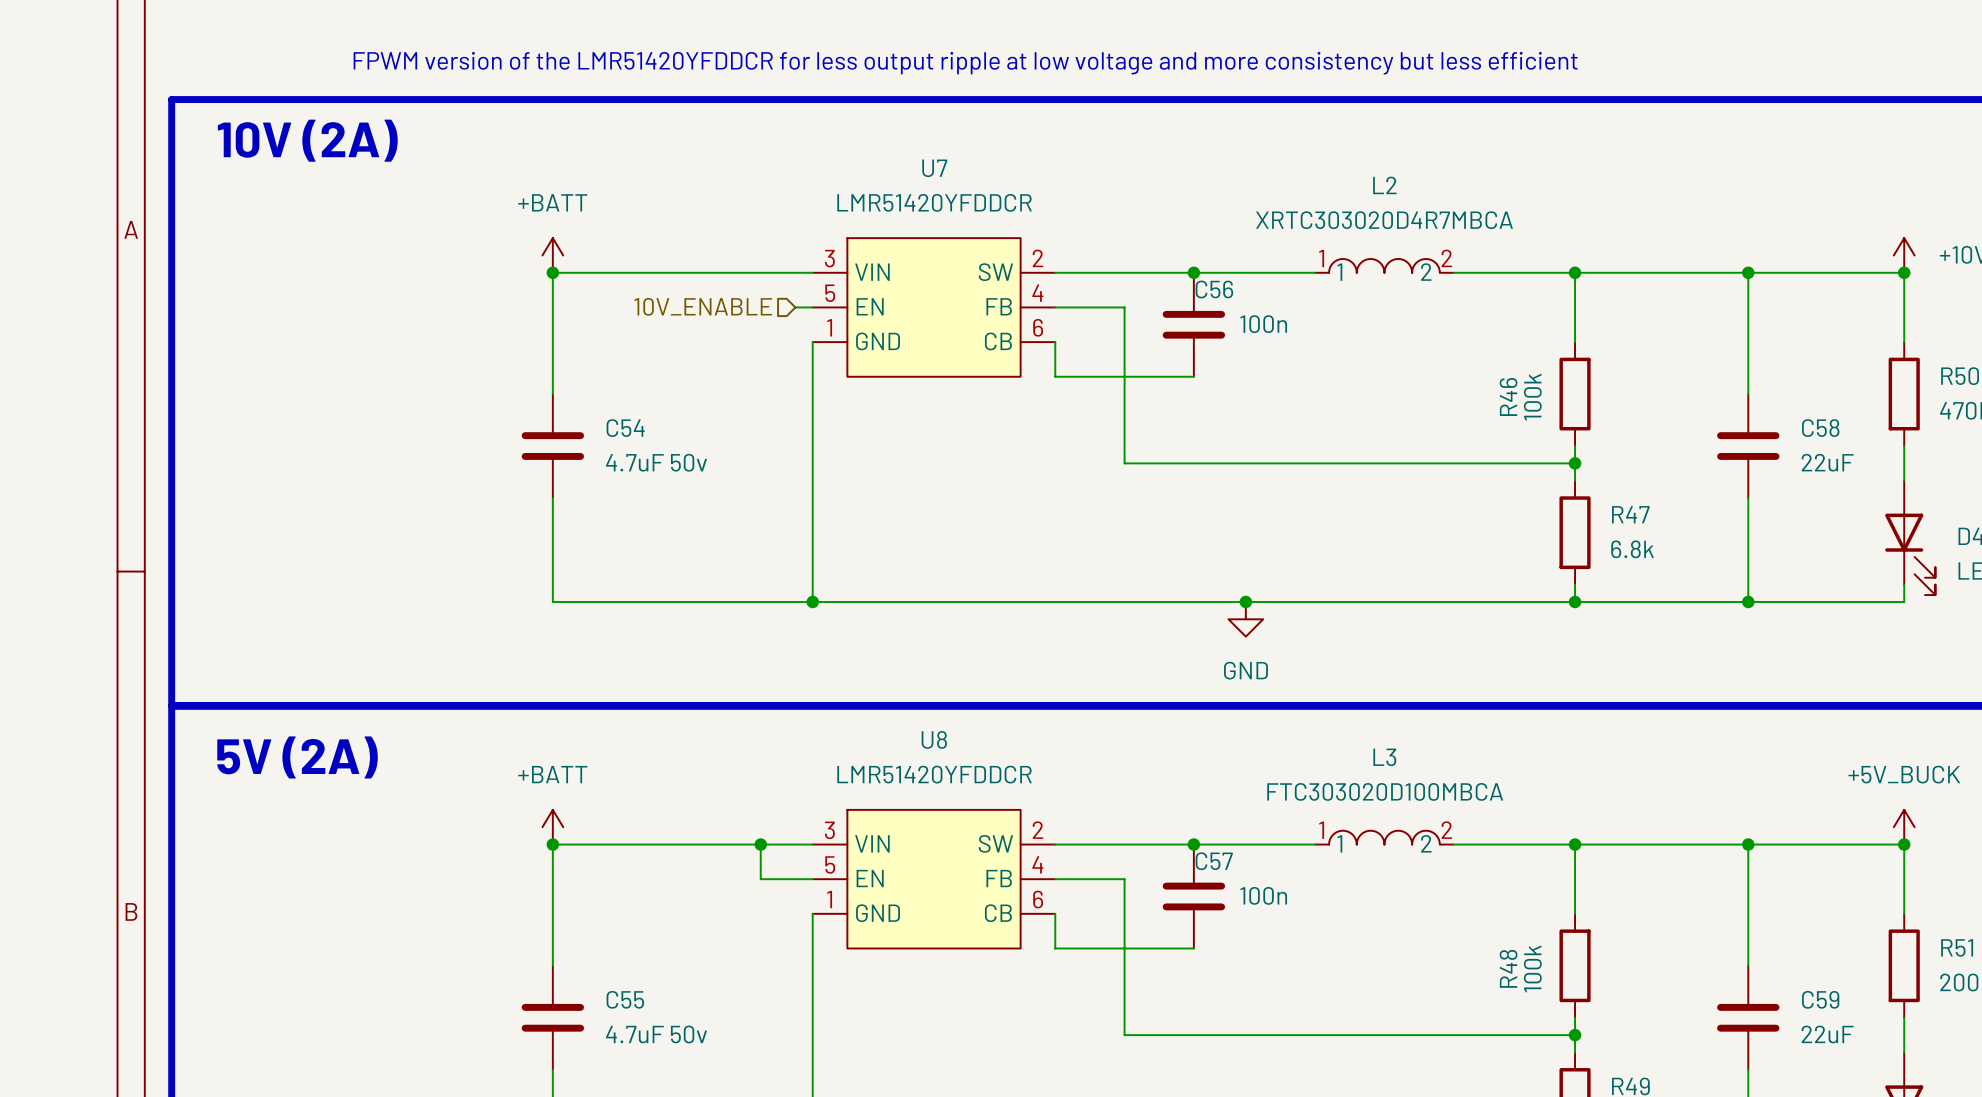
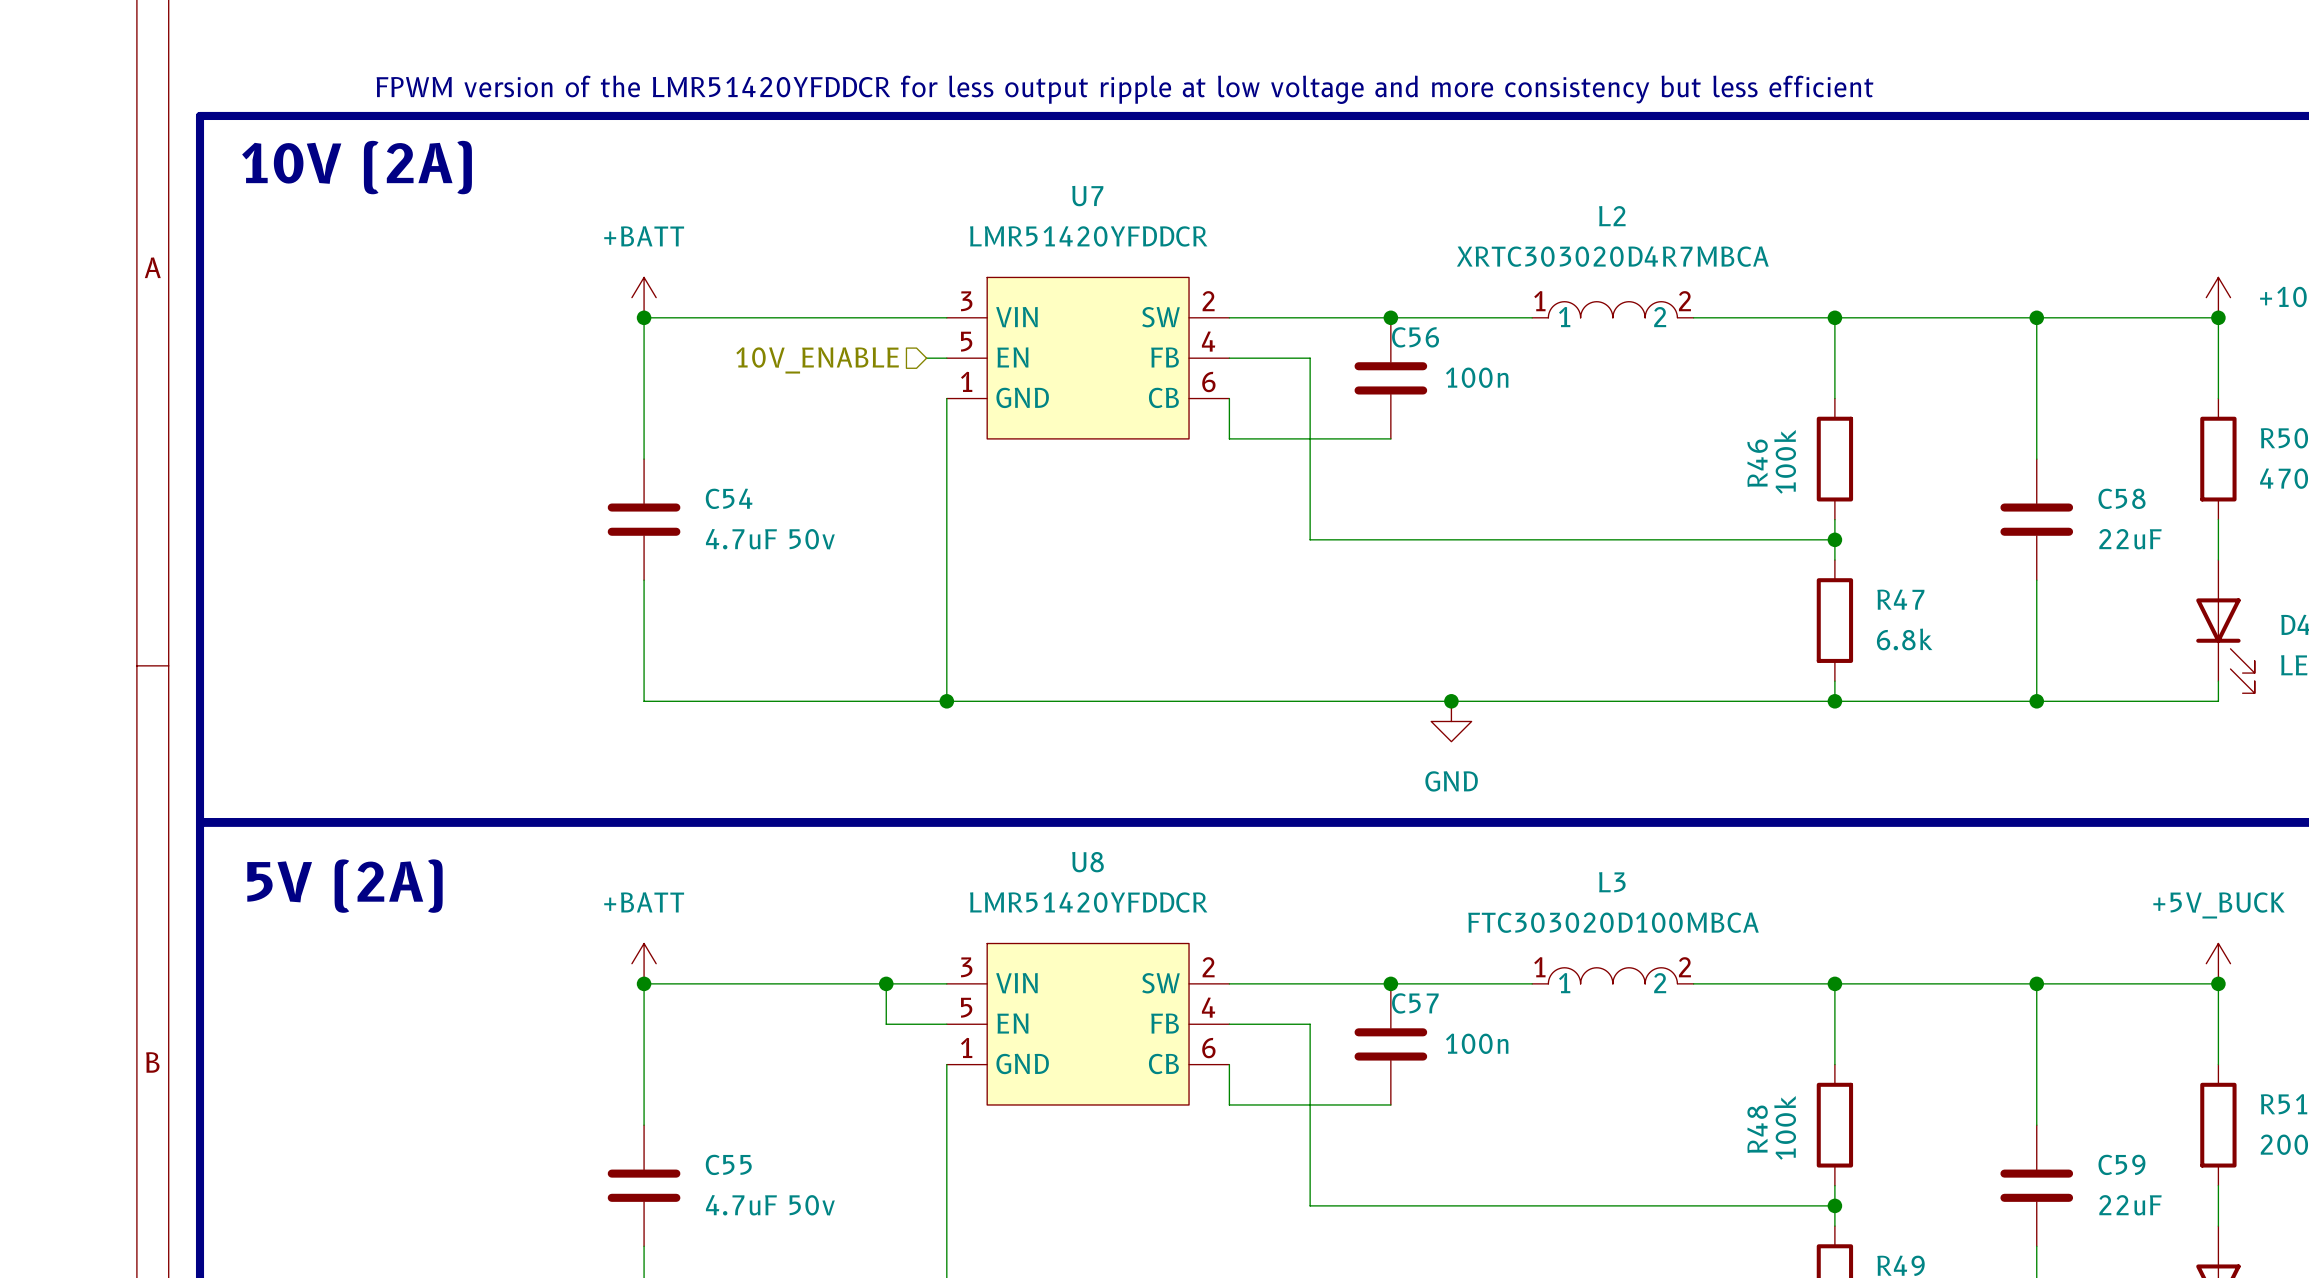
text position: FPWM version of the LMR51420YFDDCR for less output ripple at low voltage and more consistency but less efficient (965, 63) -> FPWM version of the LMR51420YFDDCR for less output ripple at low voltage and more consistency but less efficient (1124, 89)

